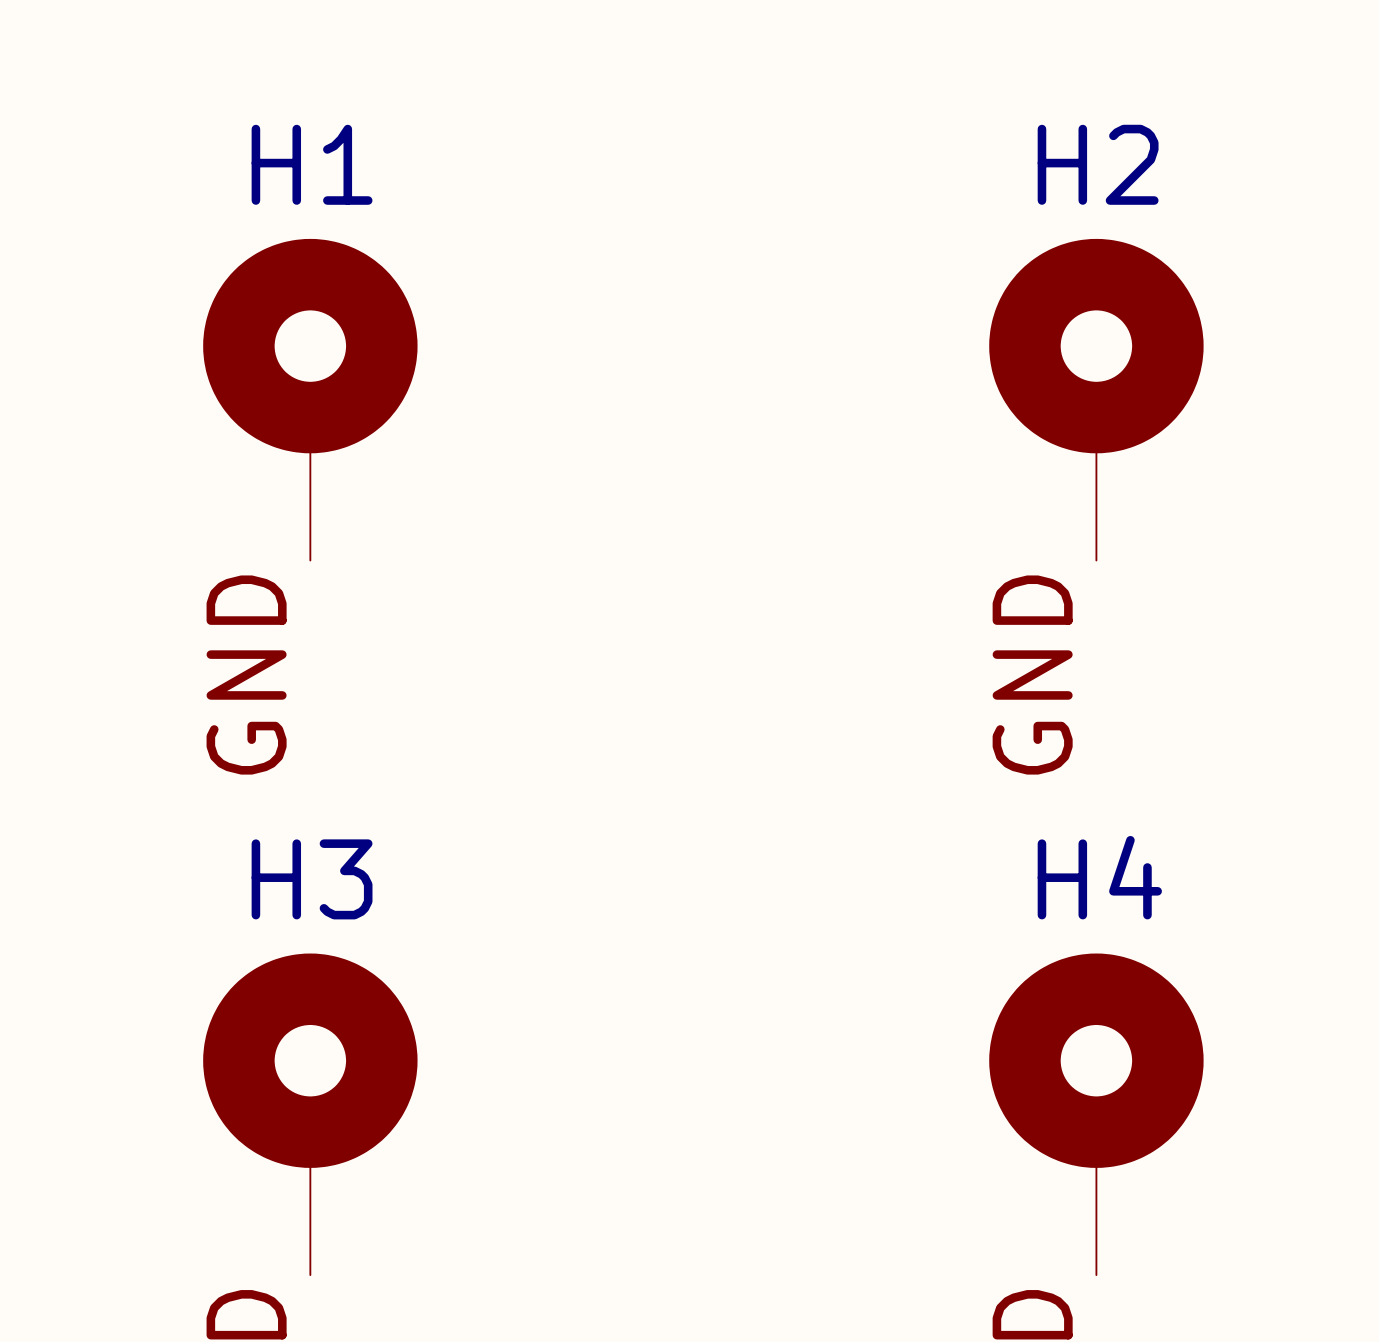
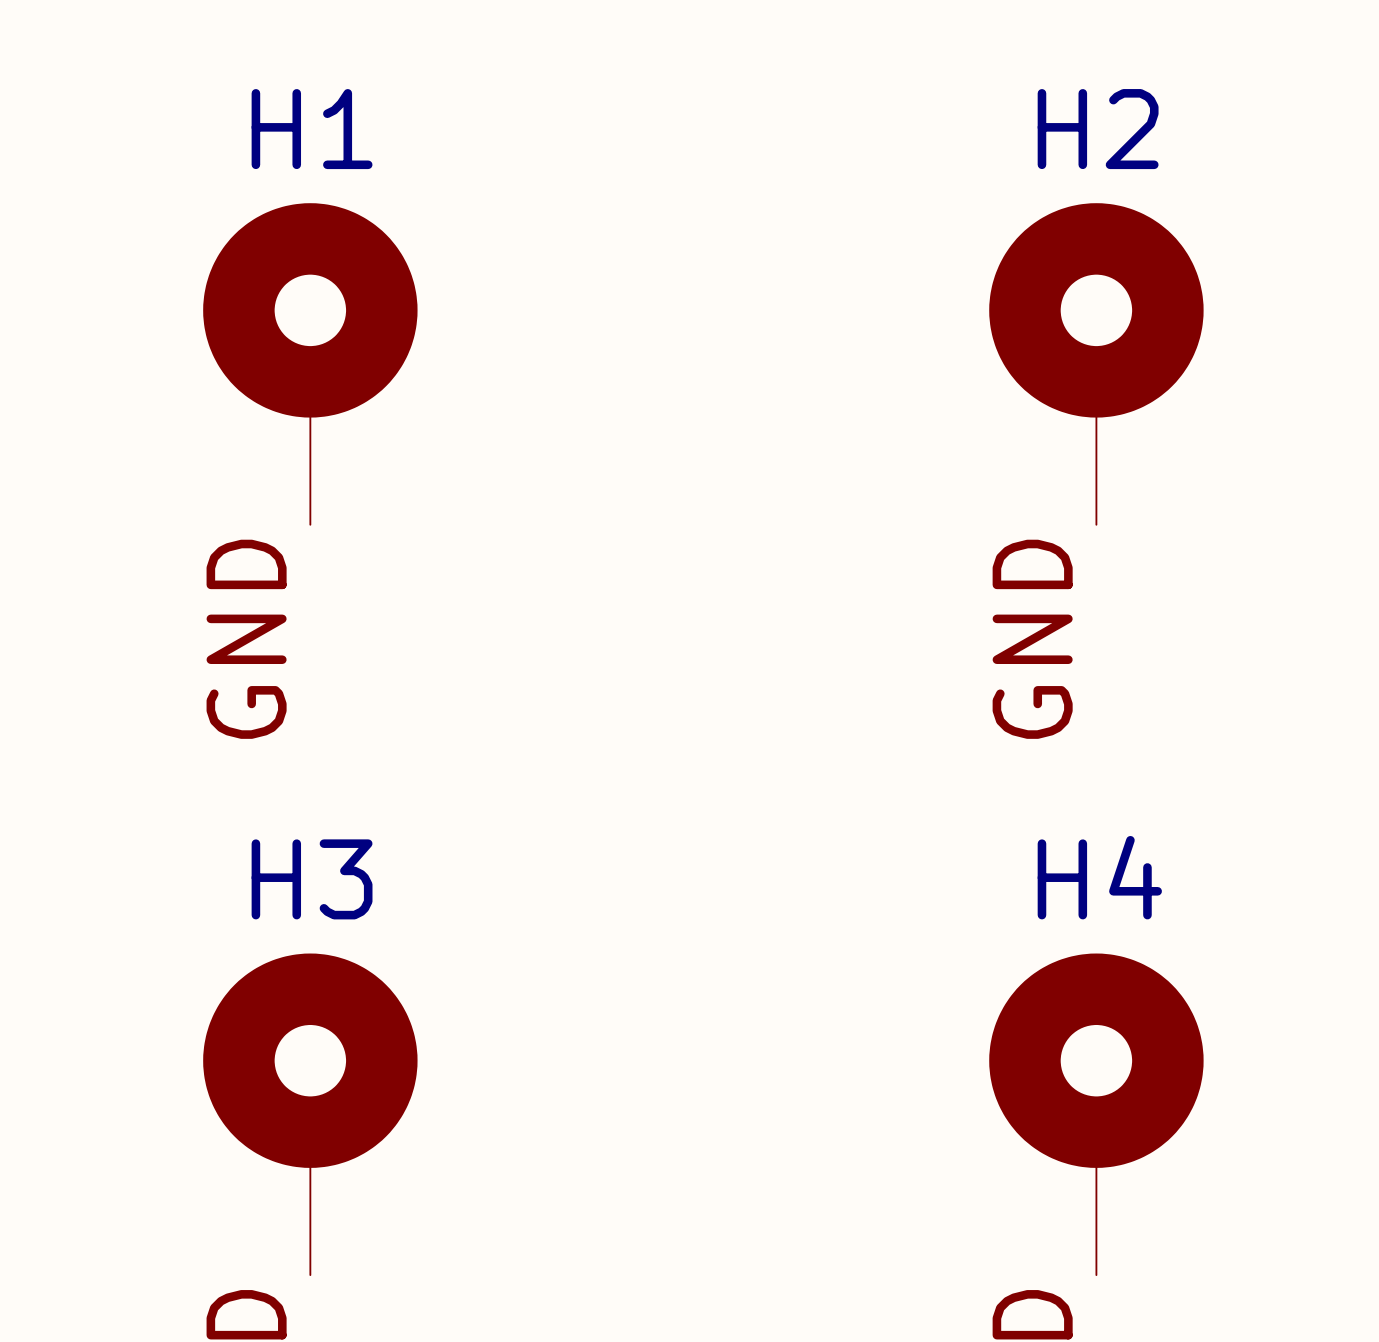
H1 position: (310, 399) -> (310, 363)
H2 position: (1096, 399) -> (1096, 363)
label position: GND (246, 675) -> GND (246, 639)
label position: GND (1032, 675) -> GND (1032, 639)

